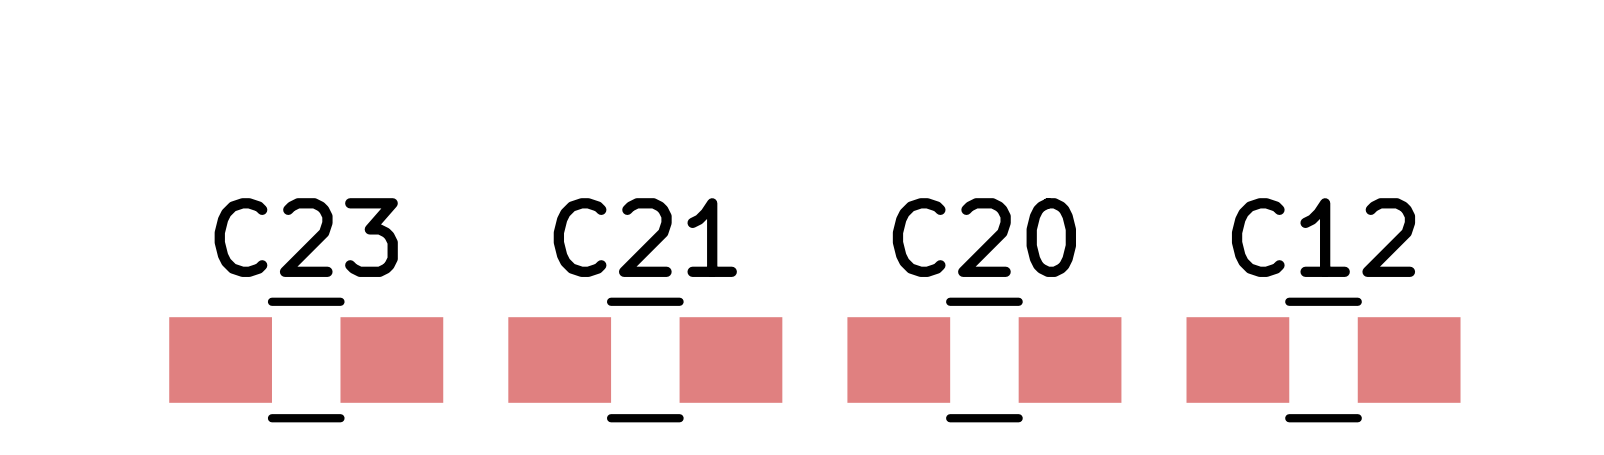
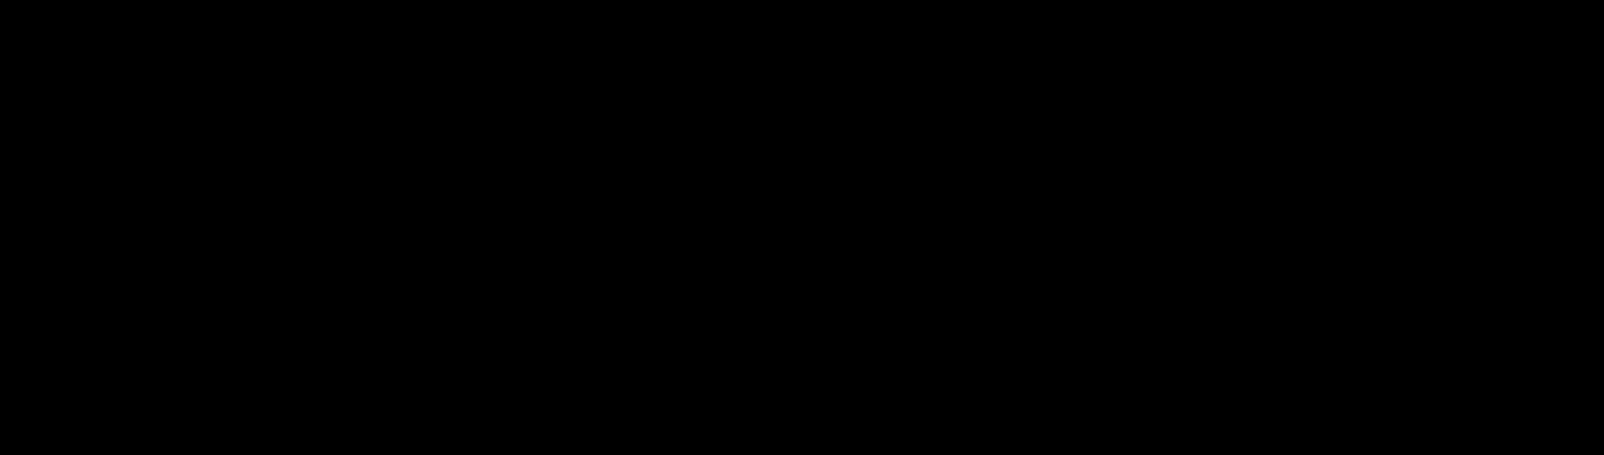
C23: (306, 360) -> none
C21: (645, 360) -> none
C20: (984, 360) -> none
C12: (1323, 360) -> none

